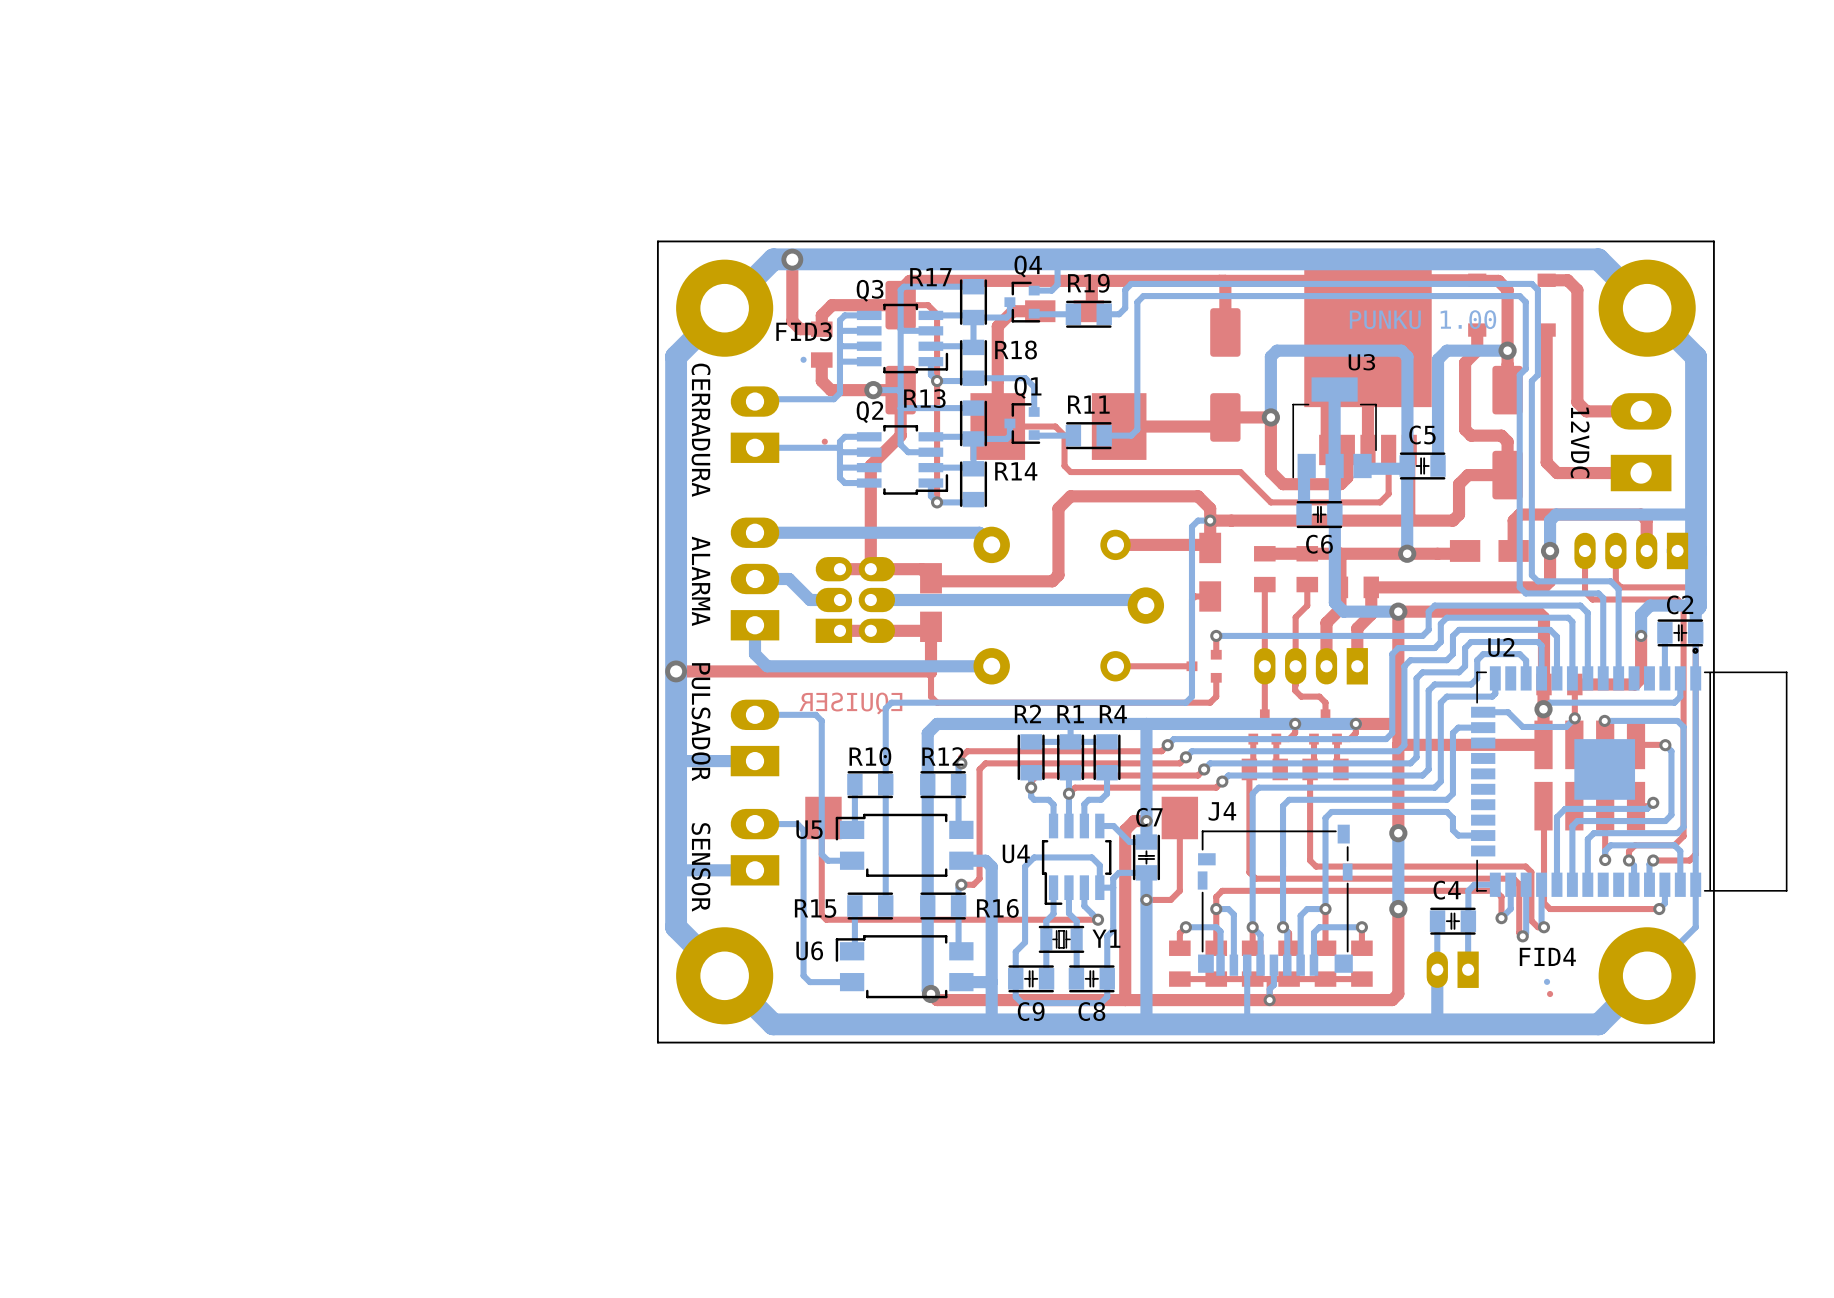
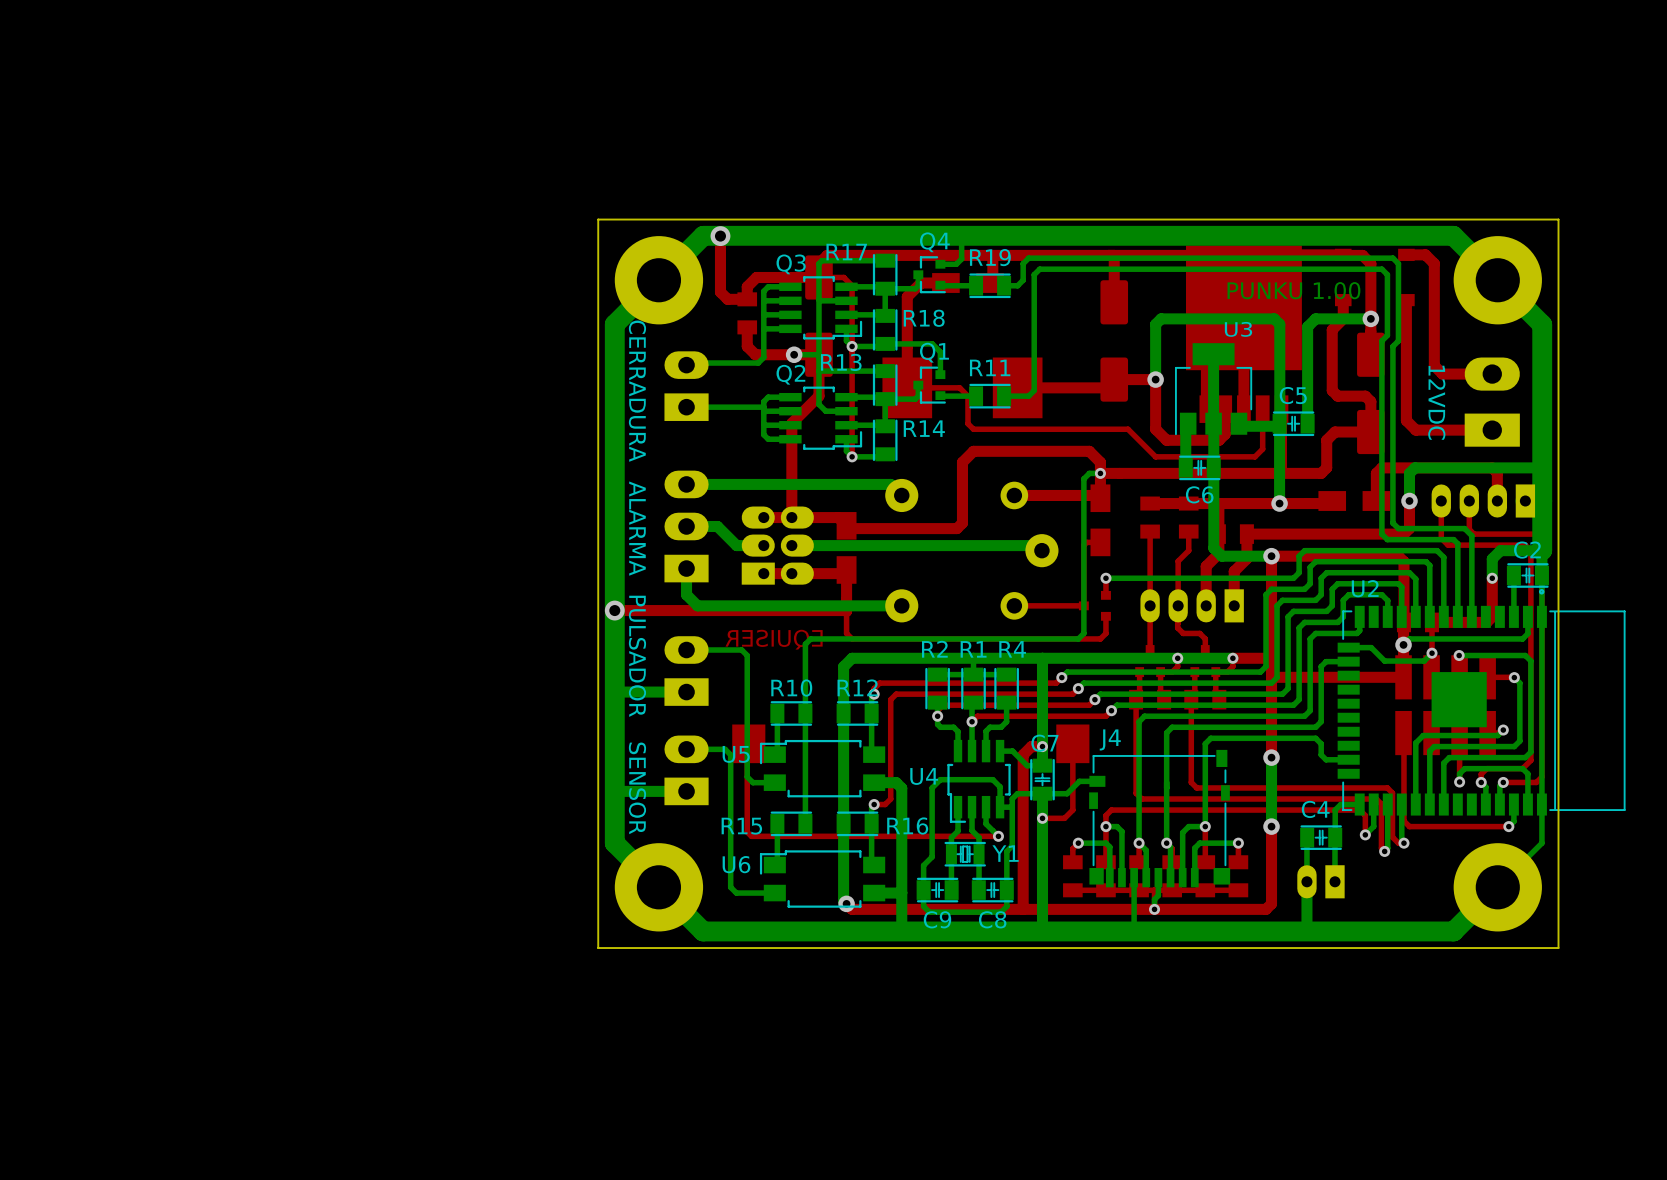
FID3: (803, 359) -> none
part: (824, 441) -> none
bottom track: none -> (1097, 781) (1079, 781) (1067, 793) (1042, 793)
FID4: (1547, 981) -> none
part: (1550, 994) -> none

